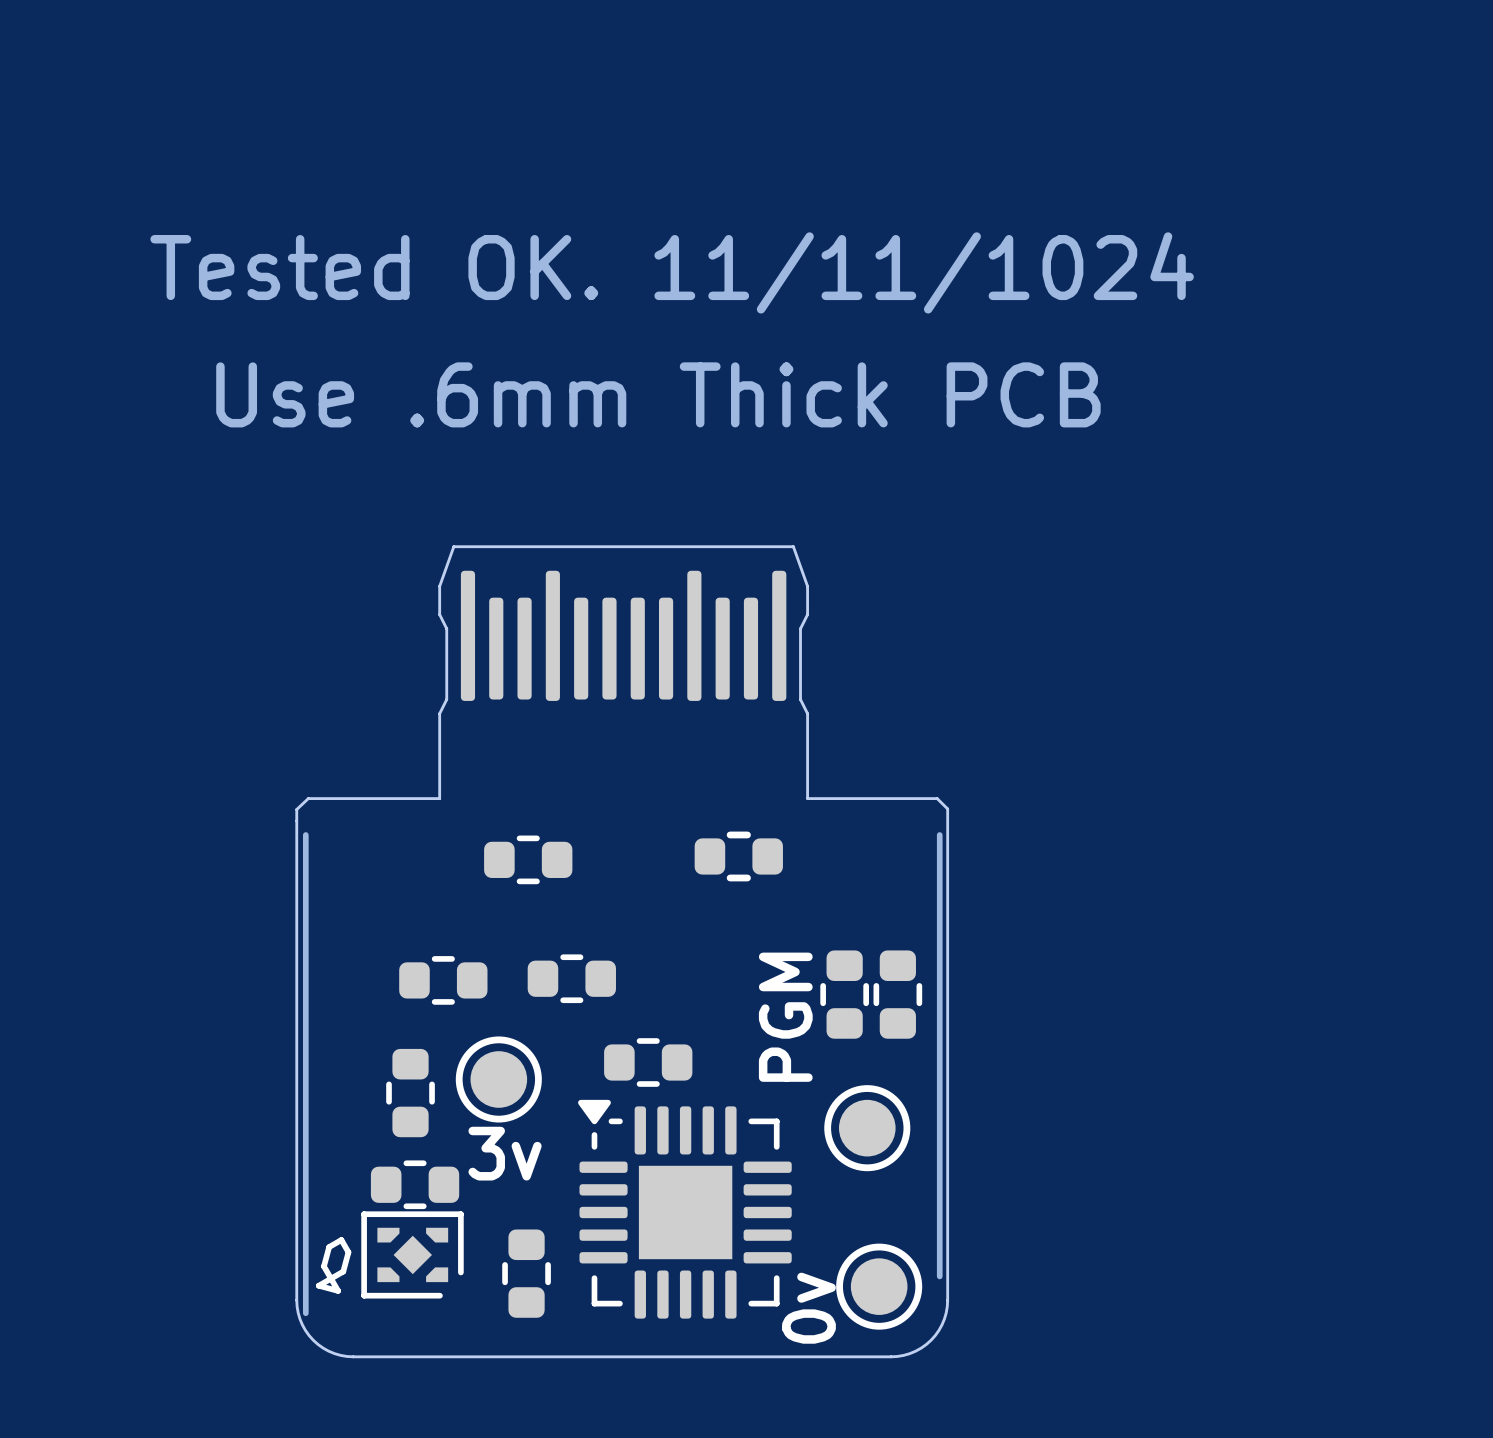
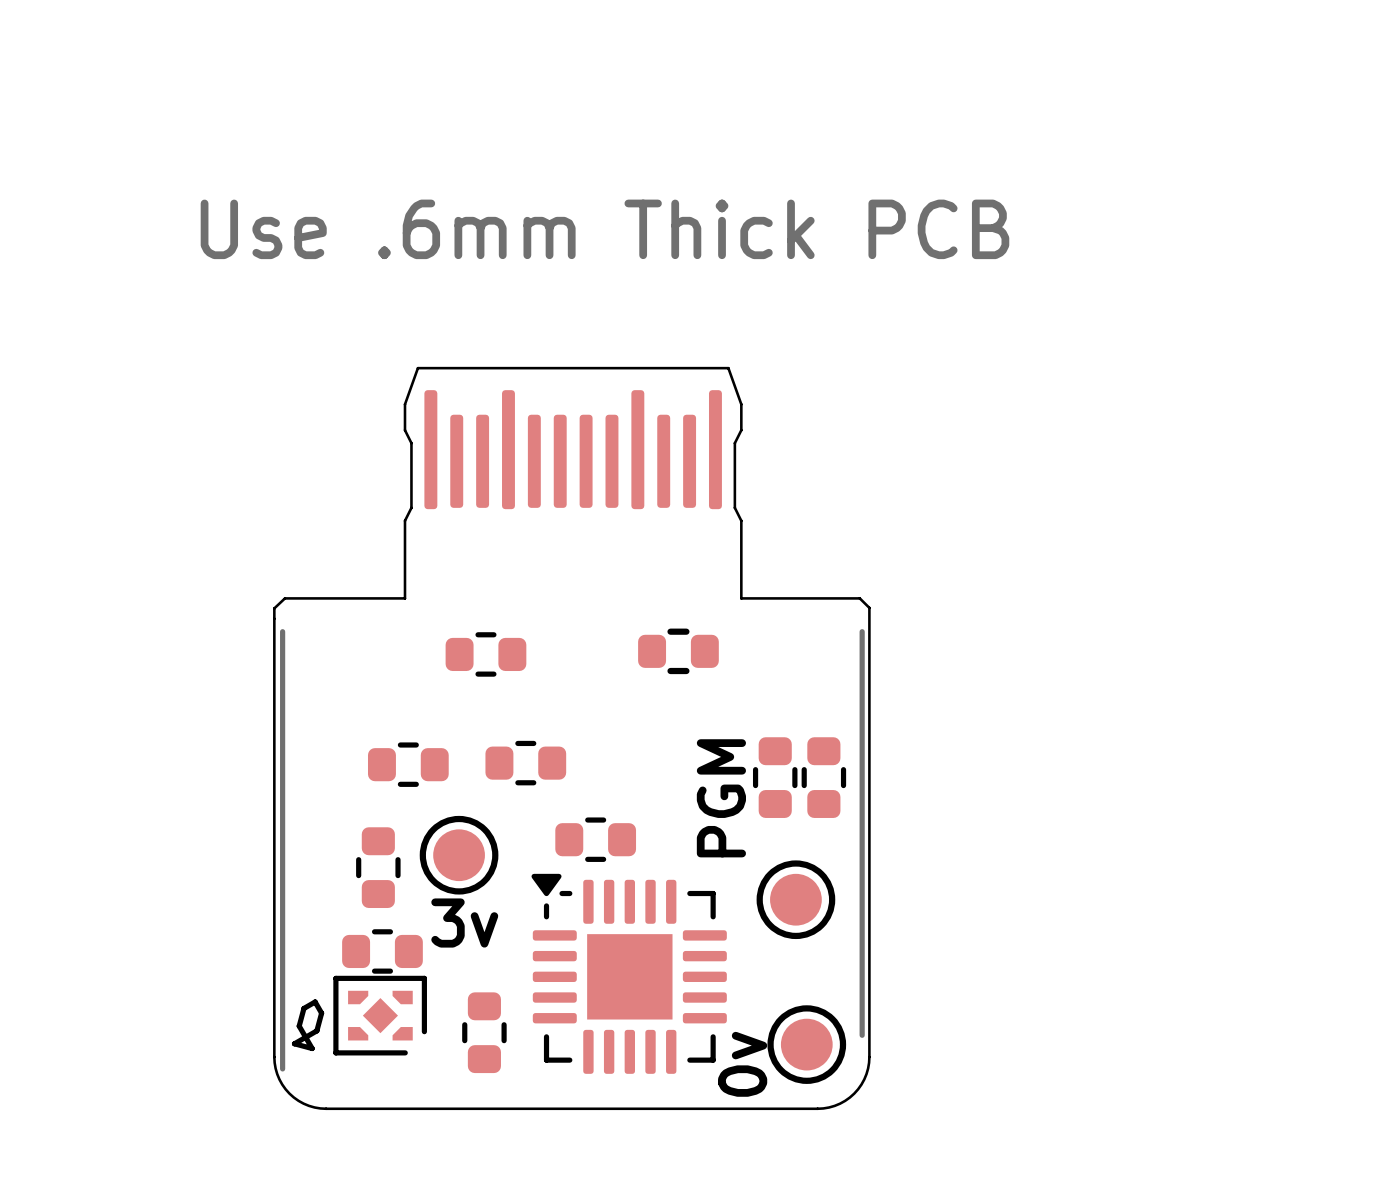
text: Tested OK. 11/11/1024 (672, 272) -> none

